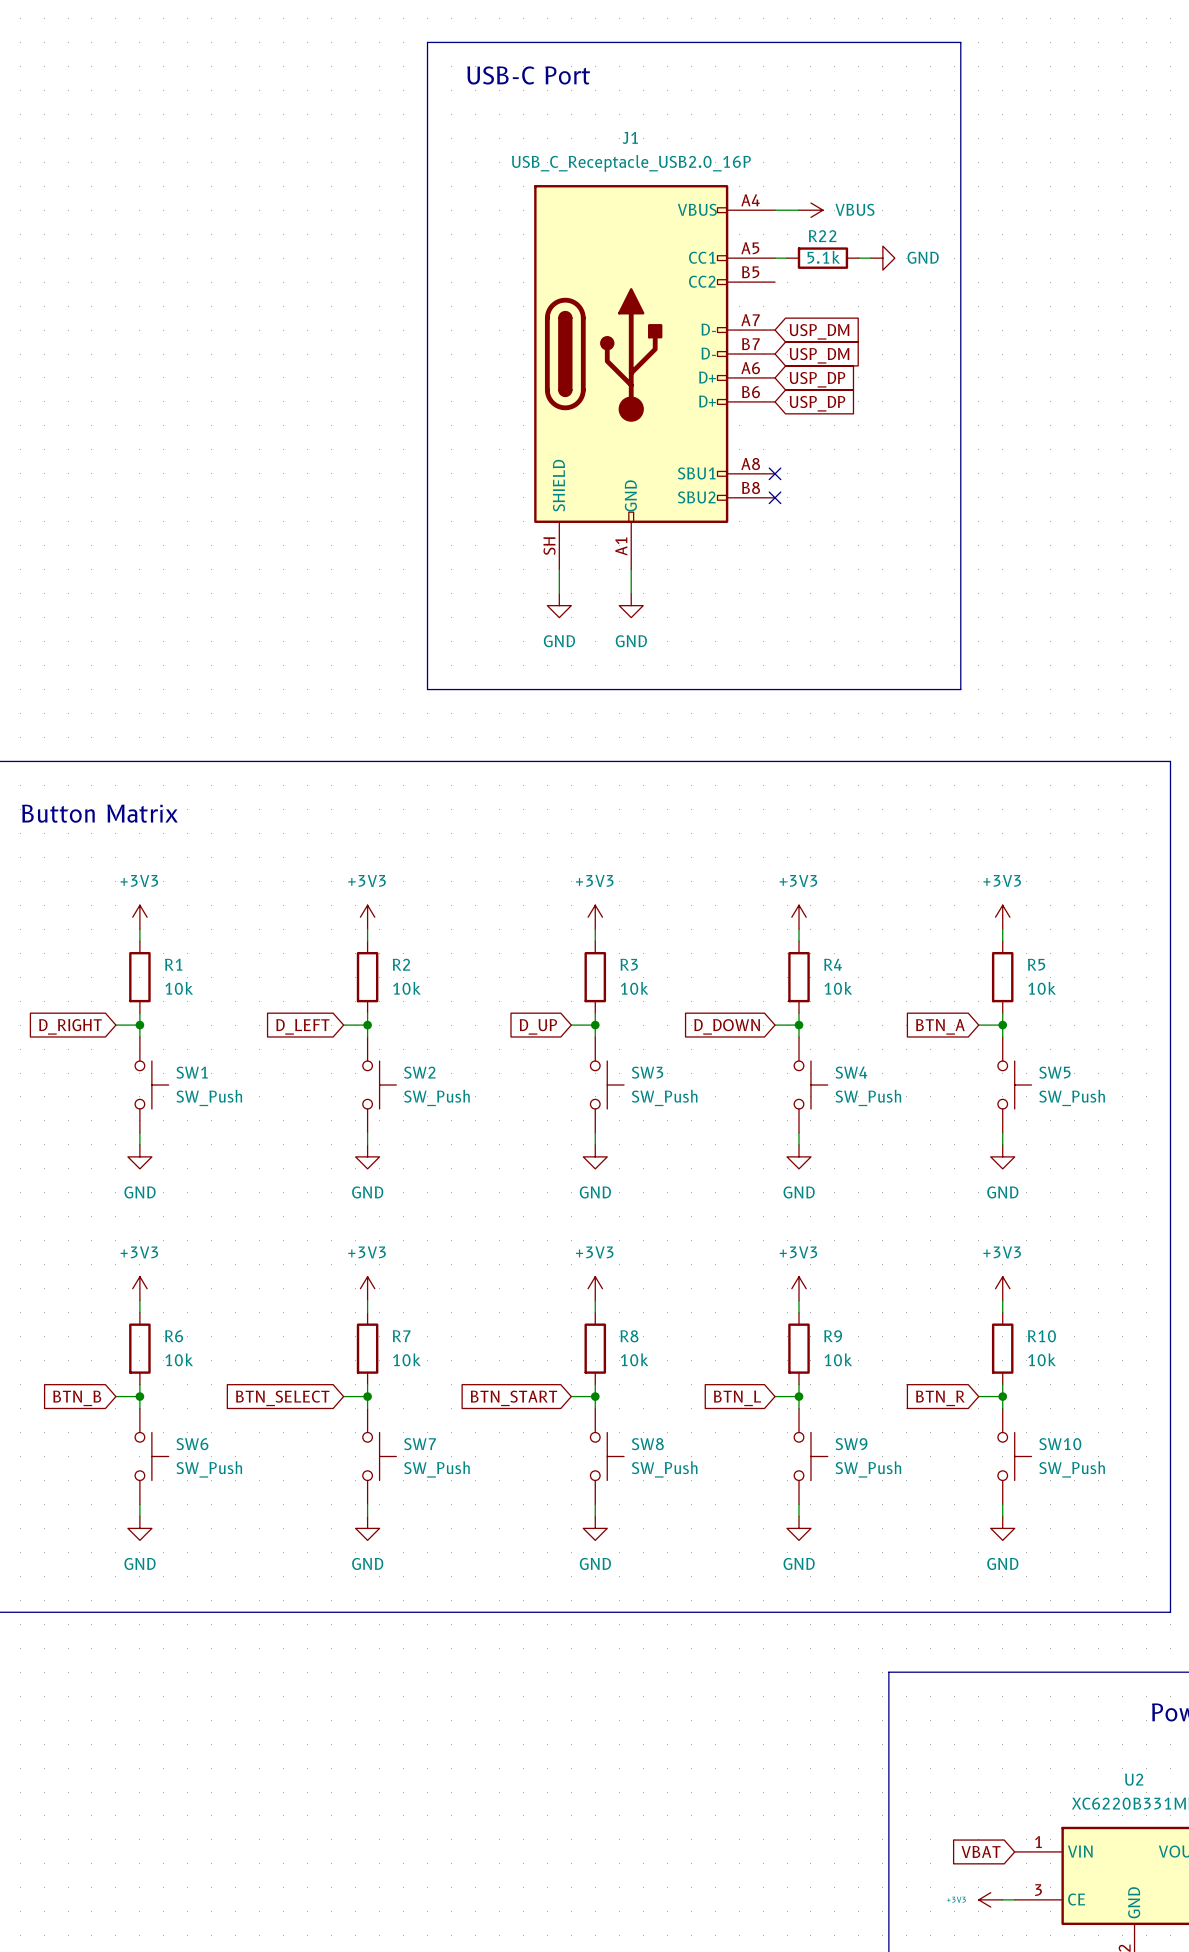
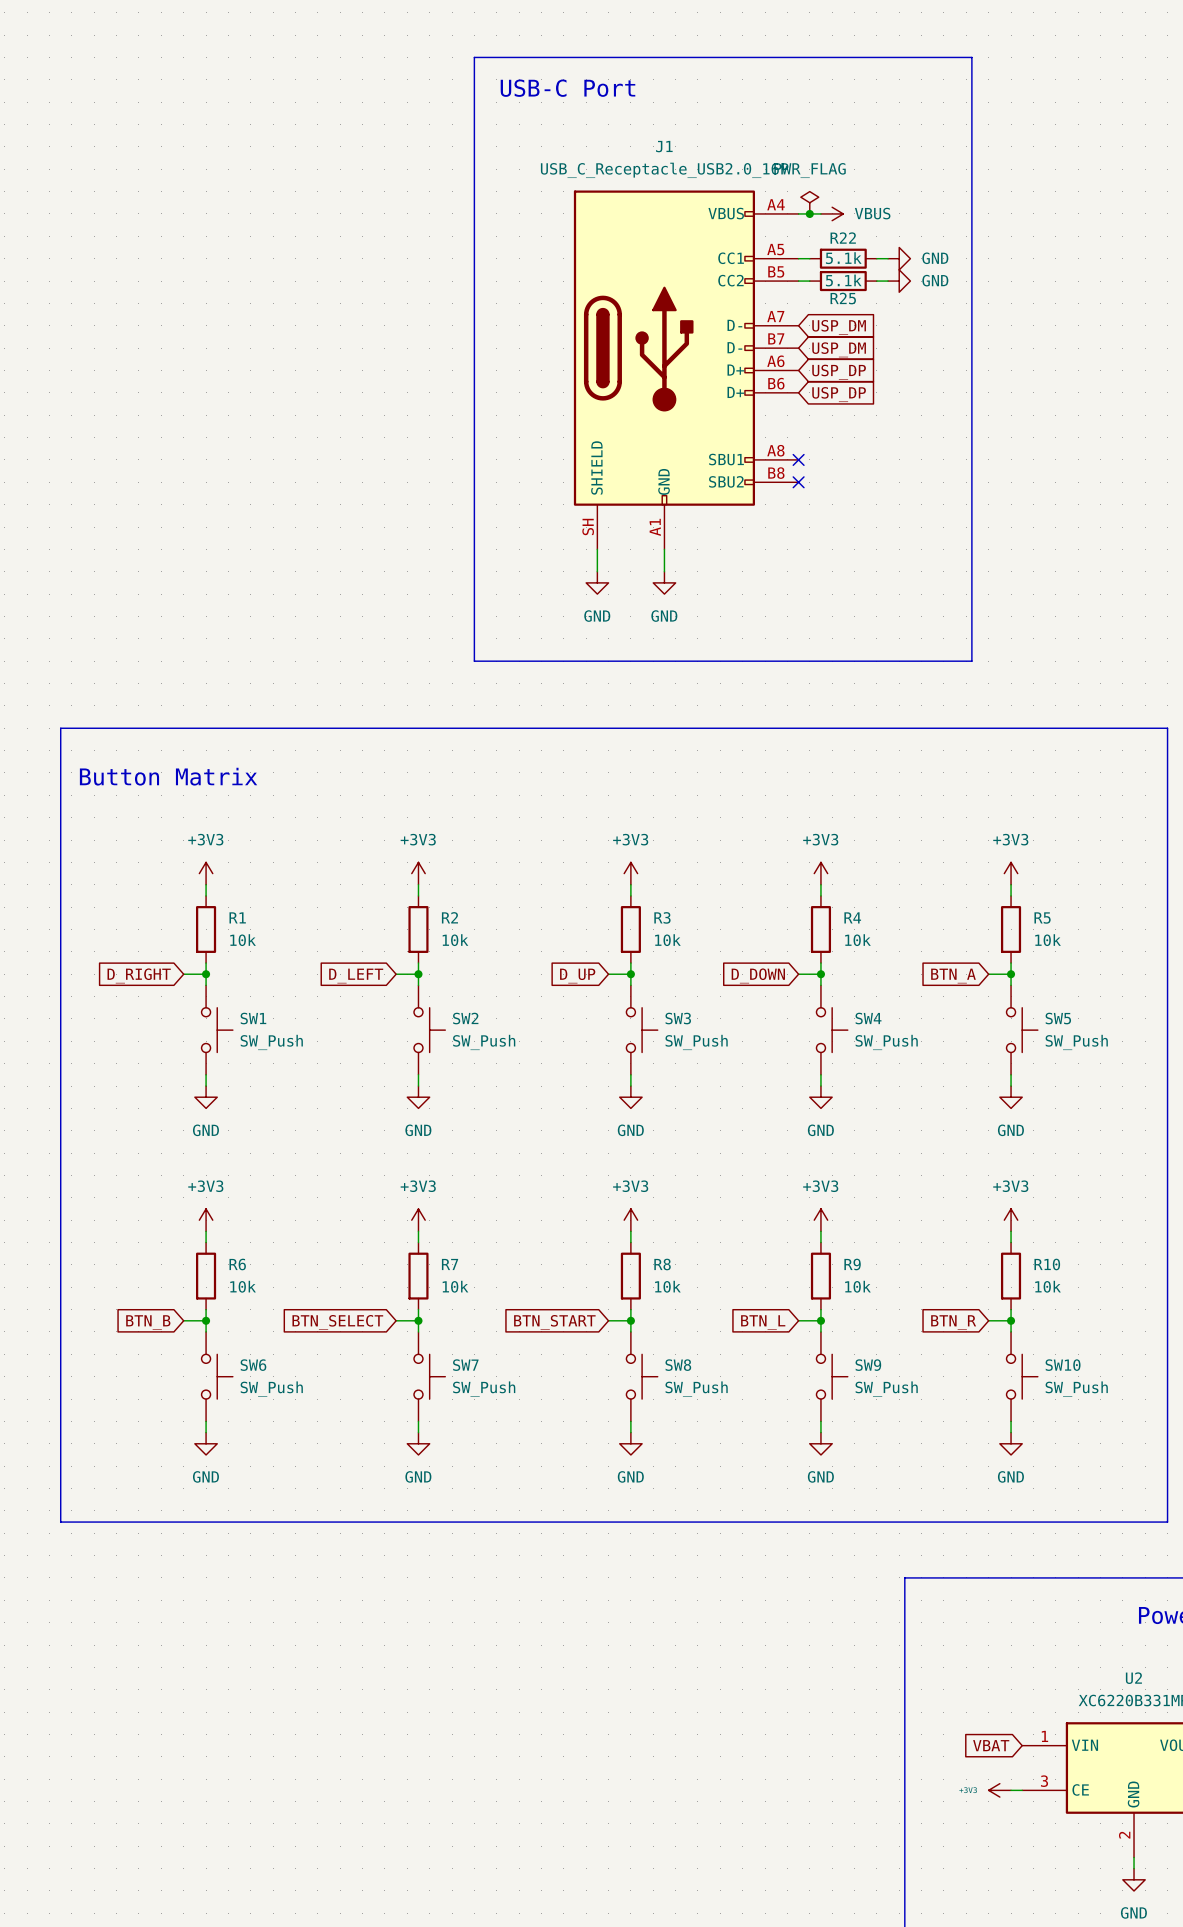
power symbol: none -> PWR_FLAG (809, 202)
junction: none -> (809, 213)
wire: none -> (798, 281) (809, 281)
R25: none -> 5.1k (843, 281)
wire: none -> (876, 281) (888, 281)
power symbol: none -> GND (899, 281)

